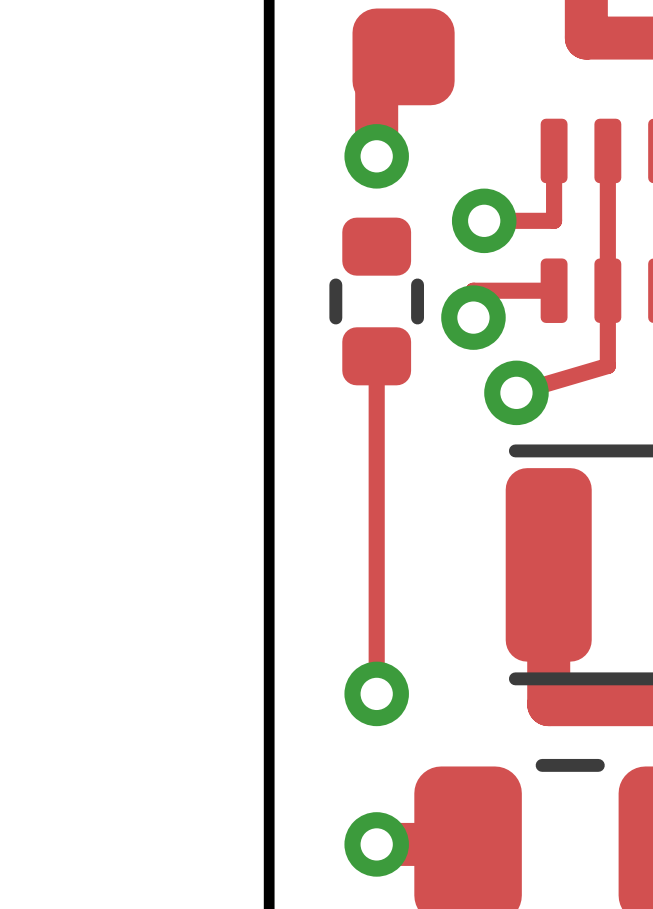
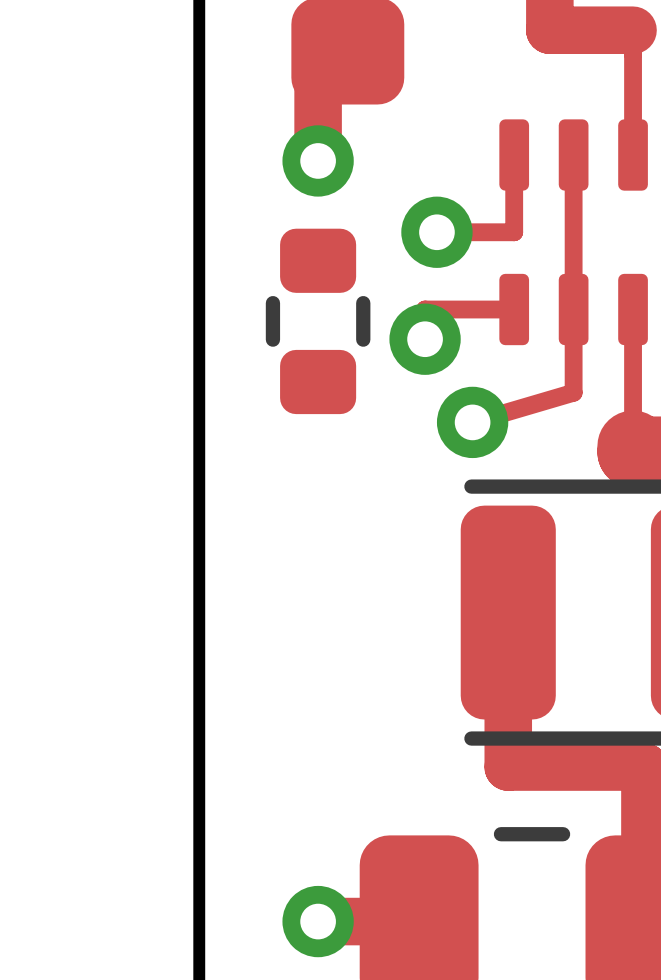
track: (376, 360) (376, 693) -> none
via: (376, 693) -> none

